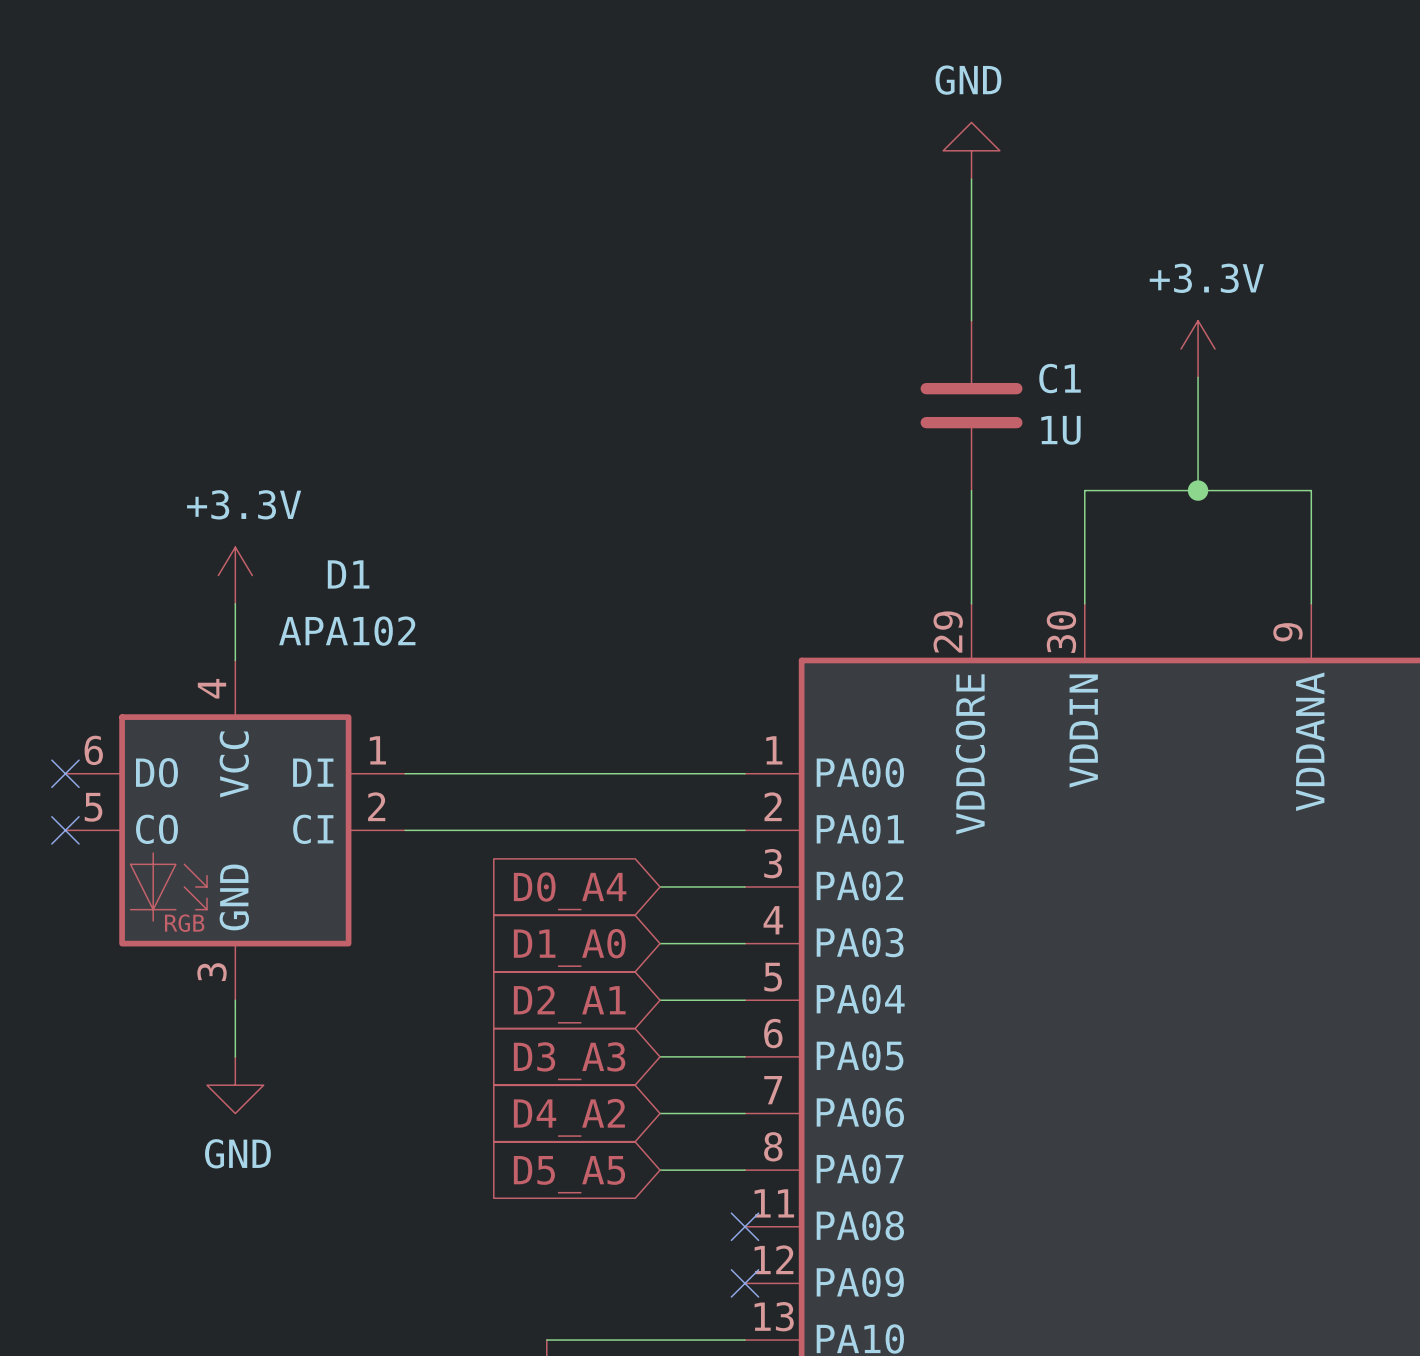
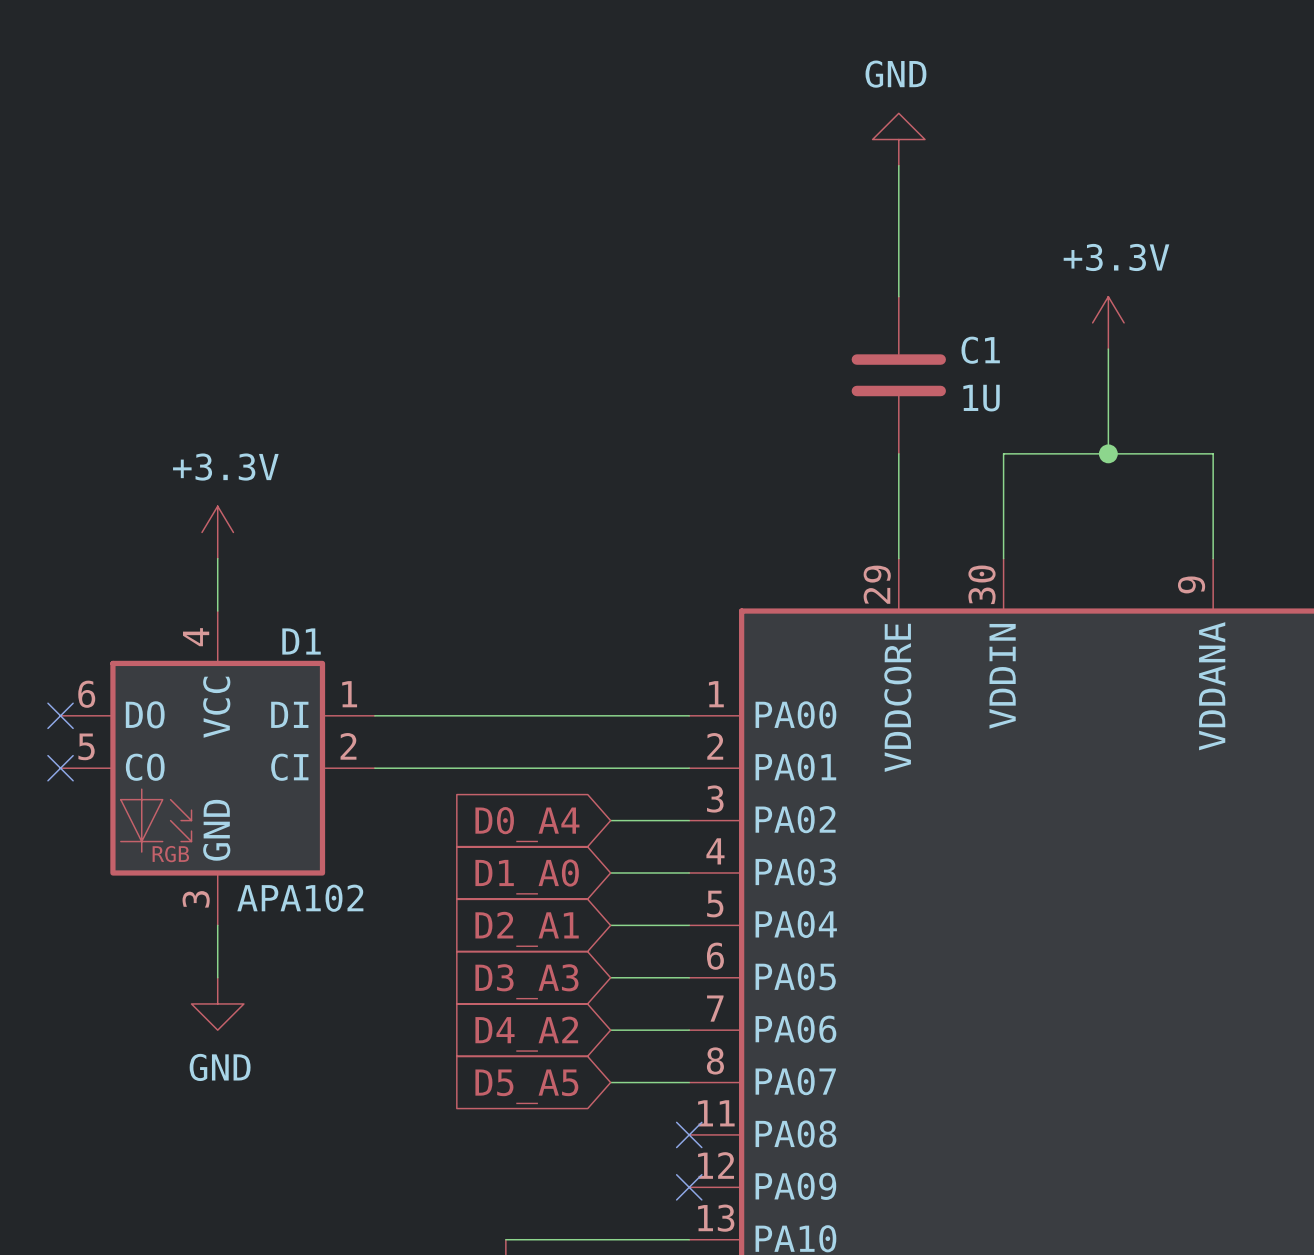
D1 name position: D1 (348, 574) -> D1 (301, 641)
D1 value position: APA102 (347, 631) -> APA102 (300, 898)

